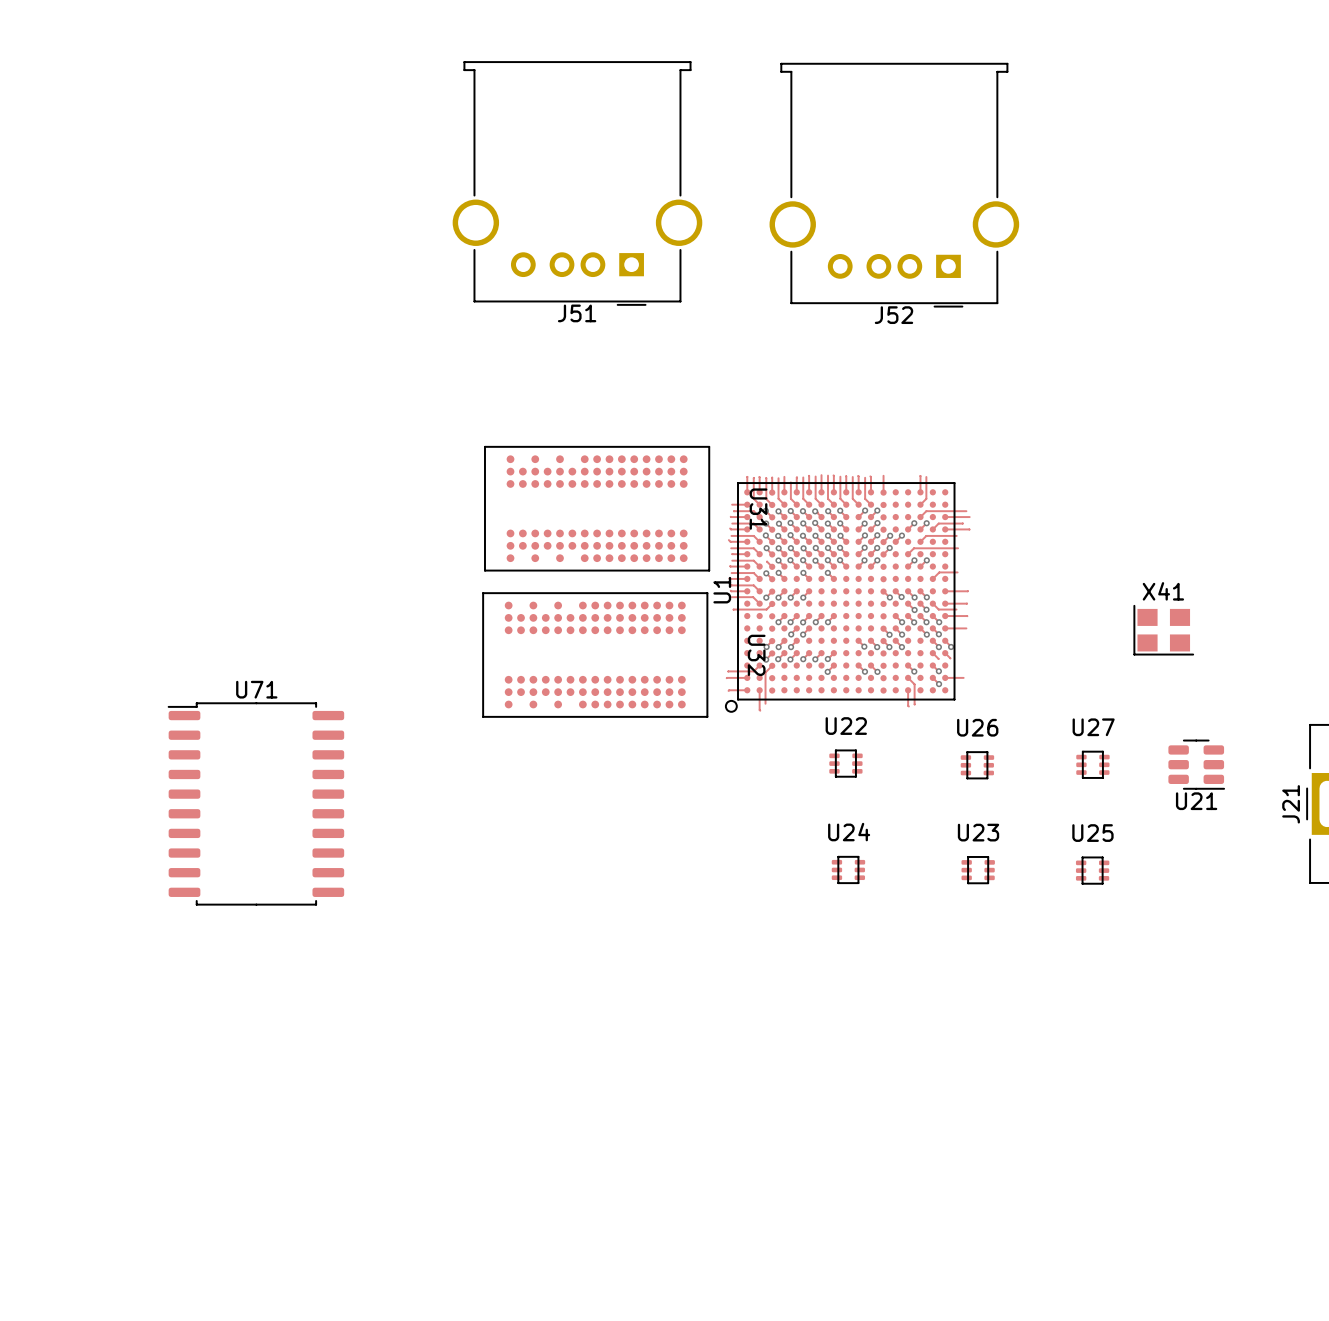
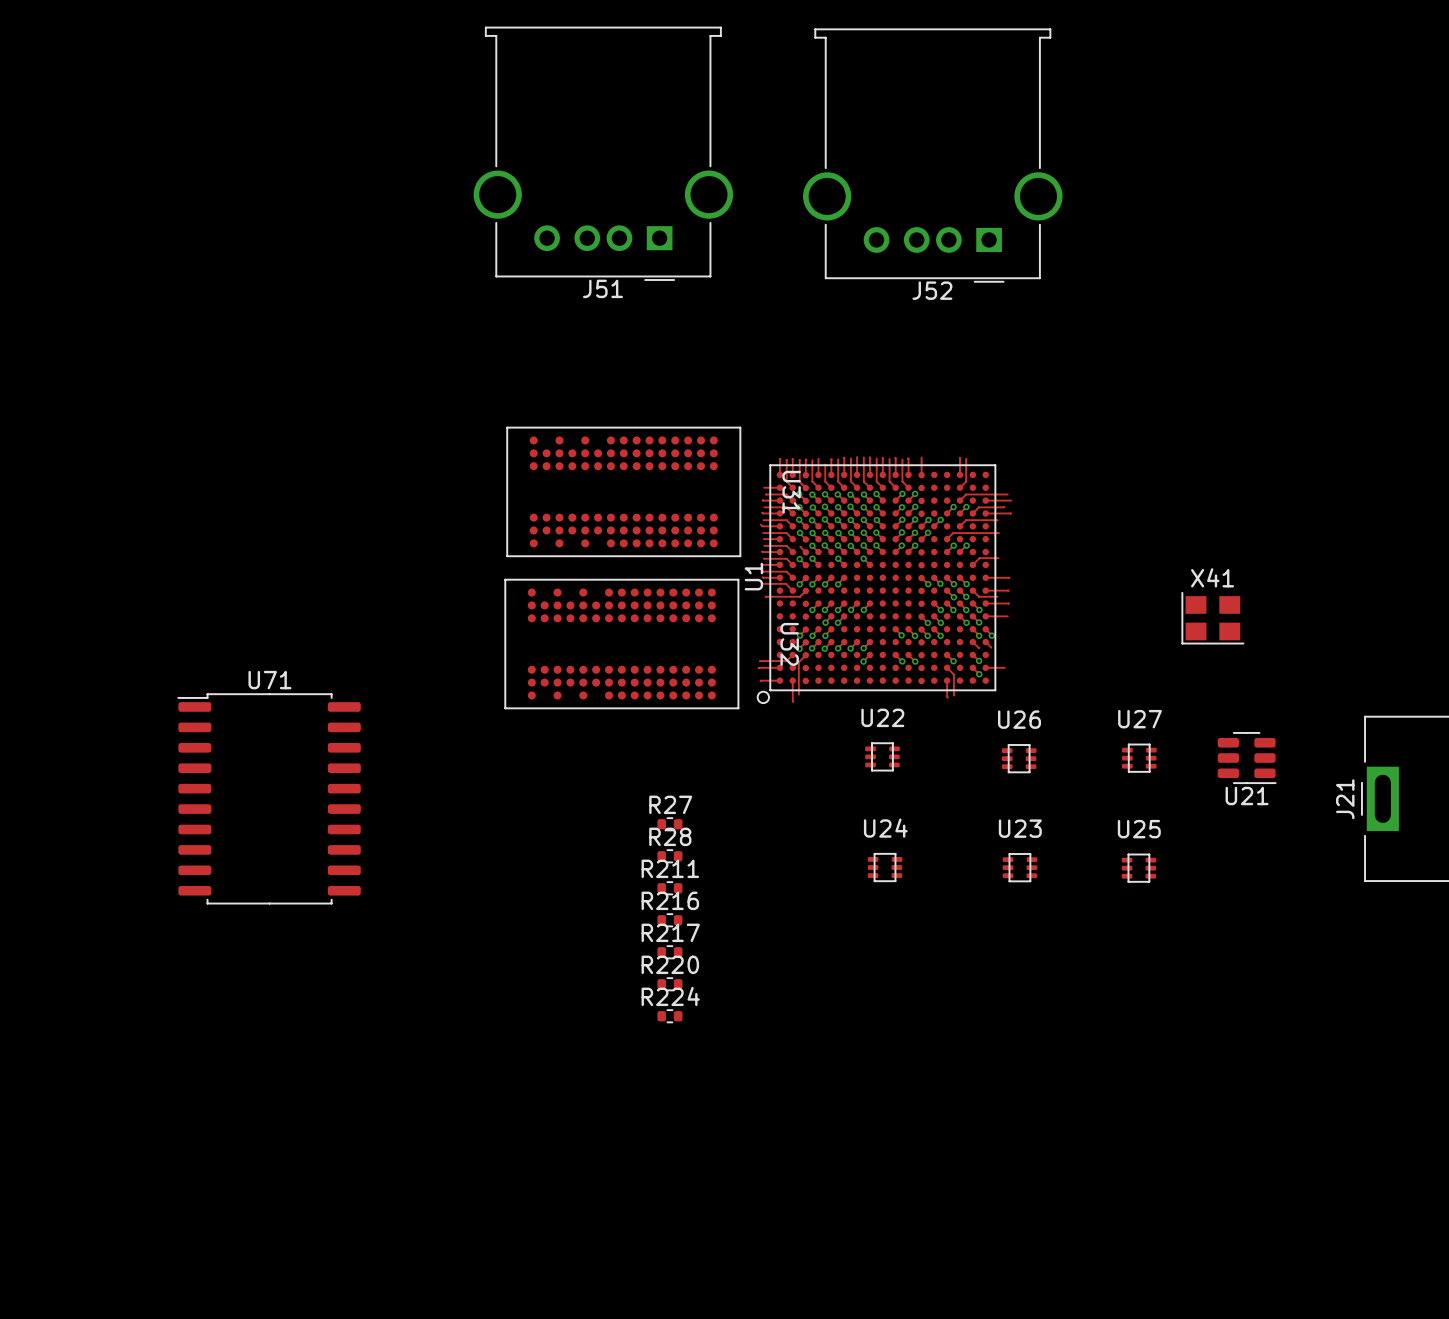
R27: none -> (669, 824)
R28: none -> (669, 856)
R211: none -> (669, 888)
R216: none -> (669, 920)
R217: none -> (669, 952)
R220: none -> (669, 984)
R224: none -> (669, 1016)

